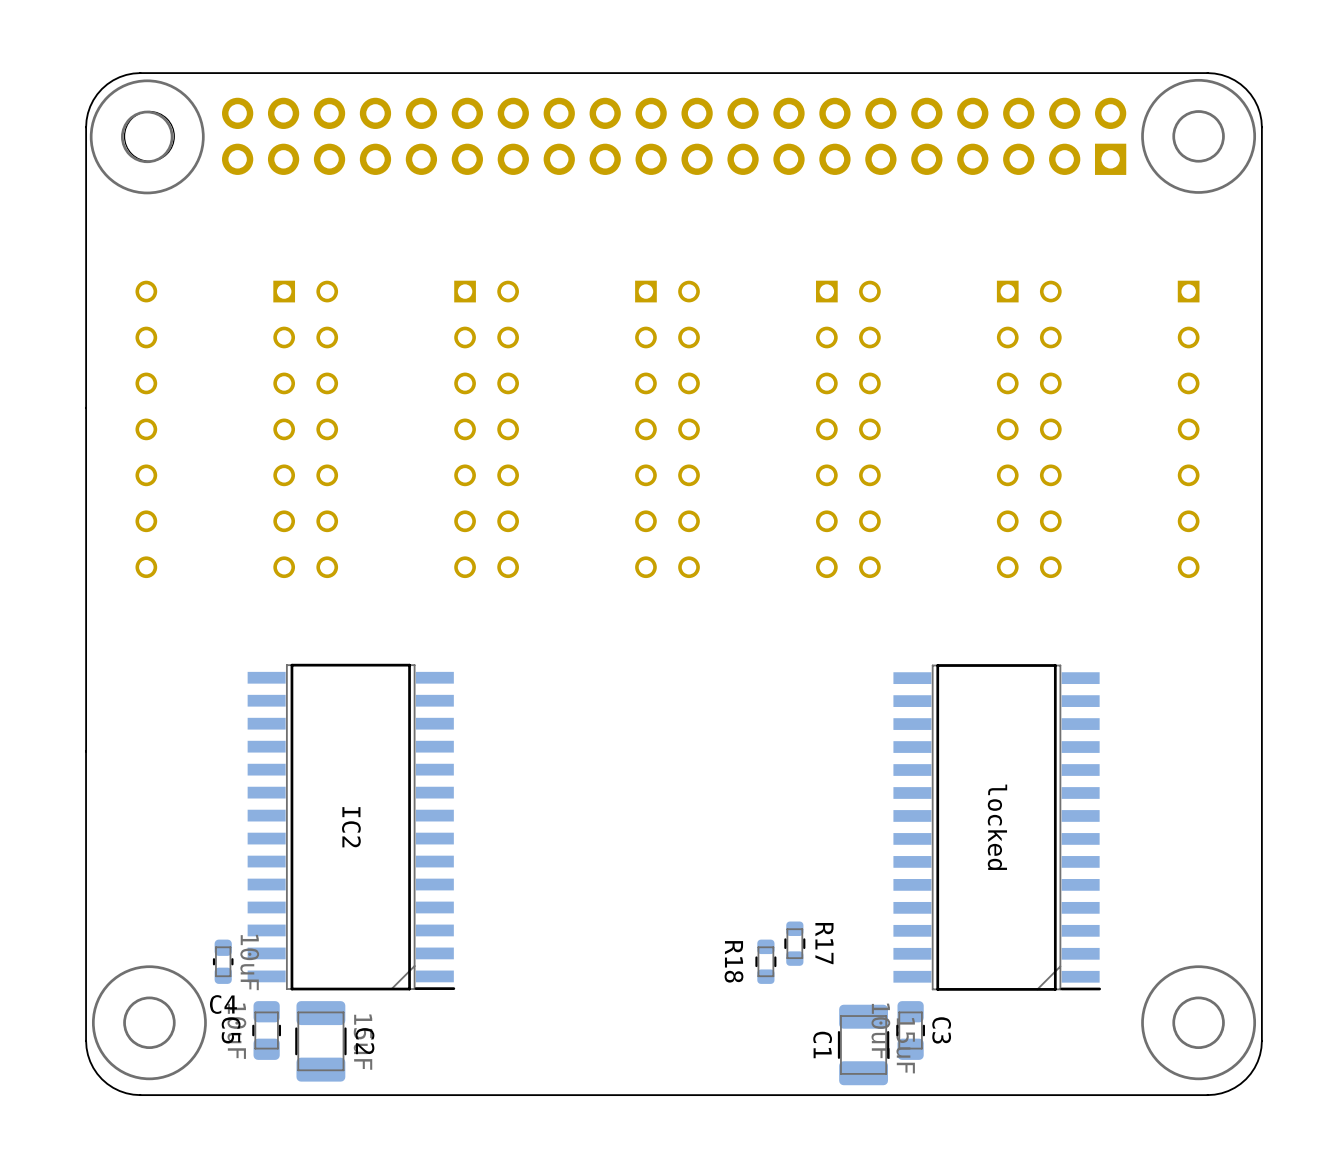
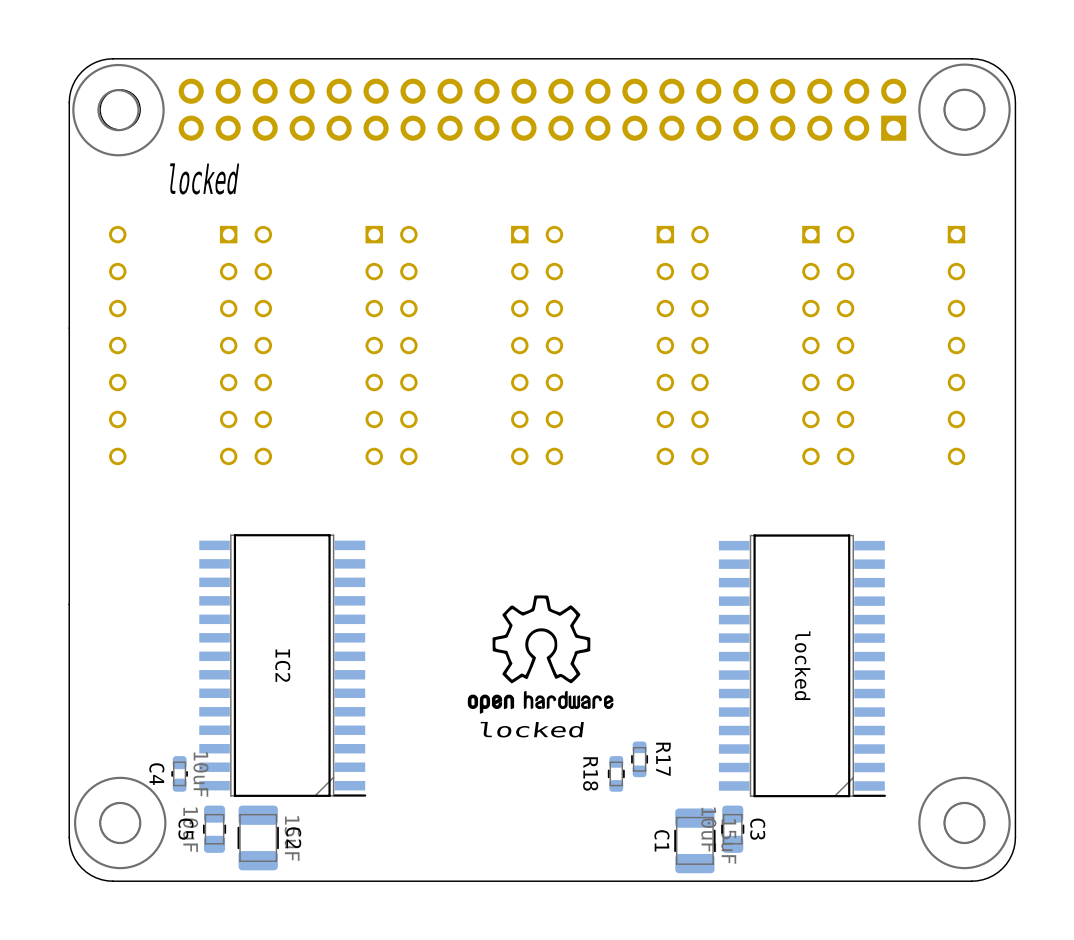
text: none -> locked (204, 178)
drawing: none -> [467, 595, 614, 714]
text: none -> locked (532, 729)
C4 name rotation: 0° (223, 1004) -> 90° clockwise (156, 774)
C4 name position: C4 (223, 1004) -> C4 (156, 774)

